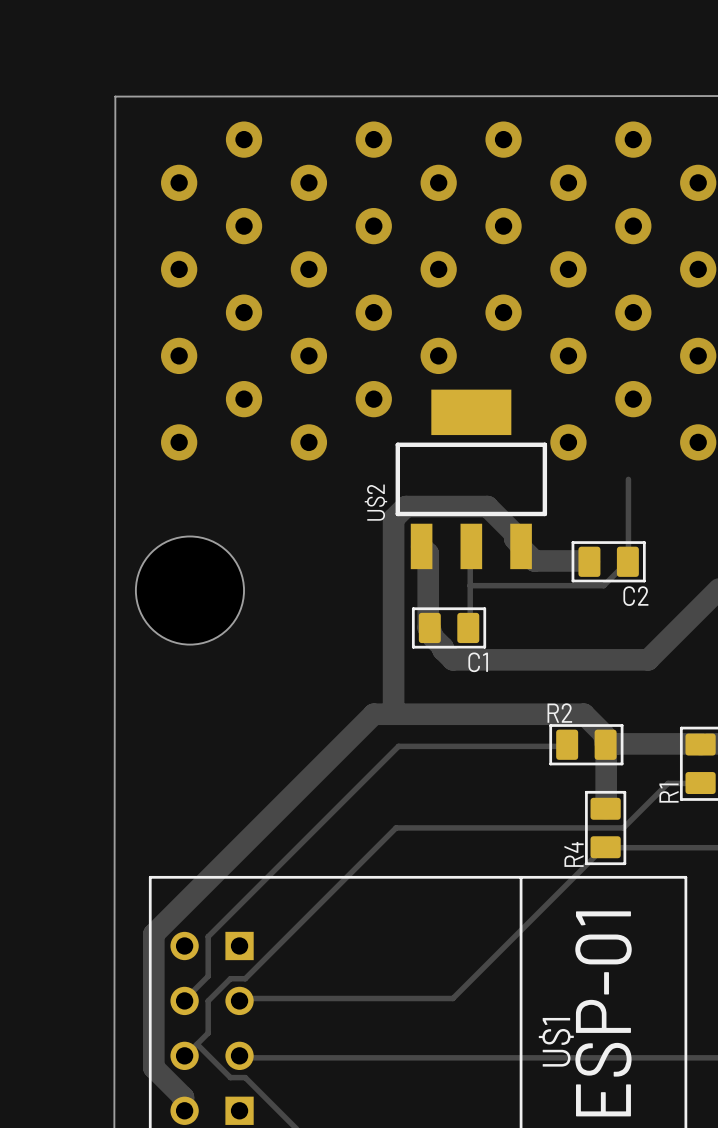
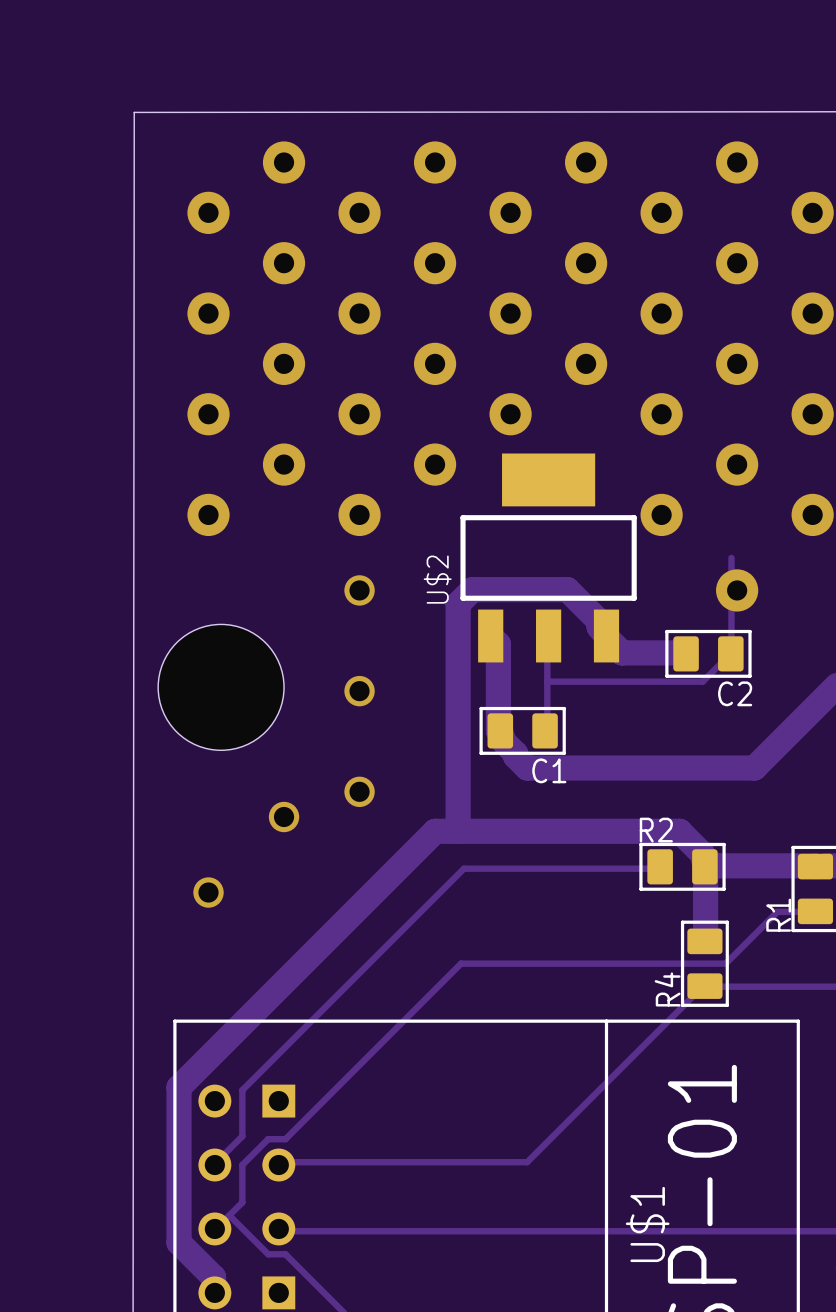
via: none -> (359, 590)
via: none -> (737, 590)
via: none -> (359, 691)
via: none -> (359, 791)
via: none -> (284, 817)
via: none -> (208, 892)

